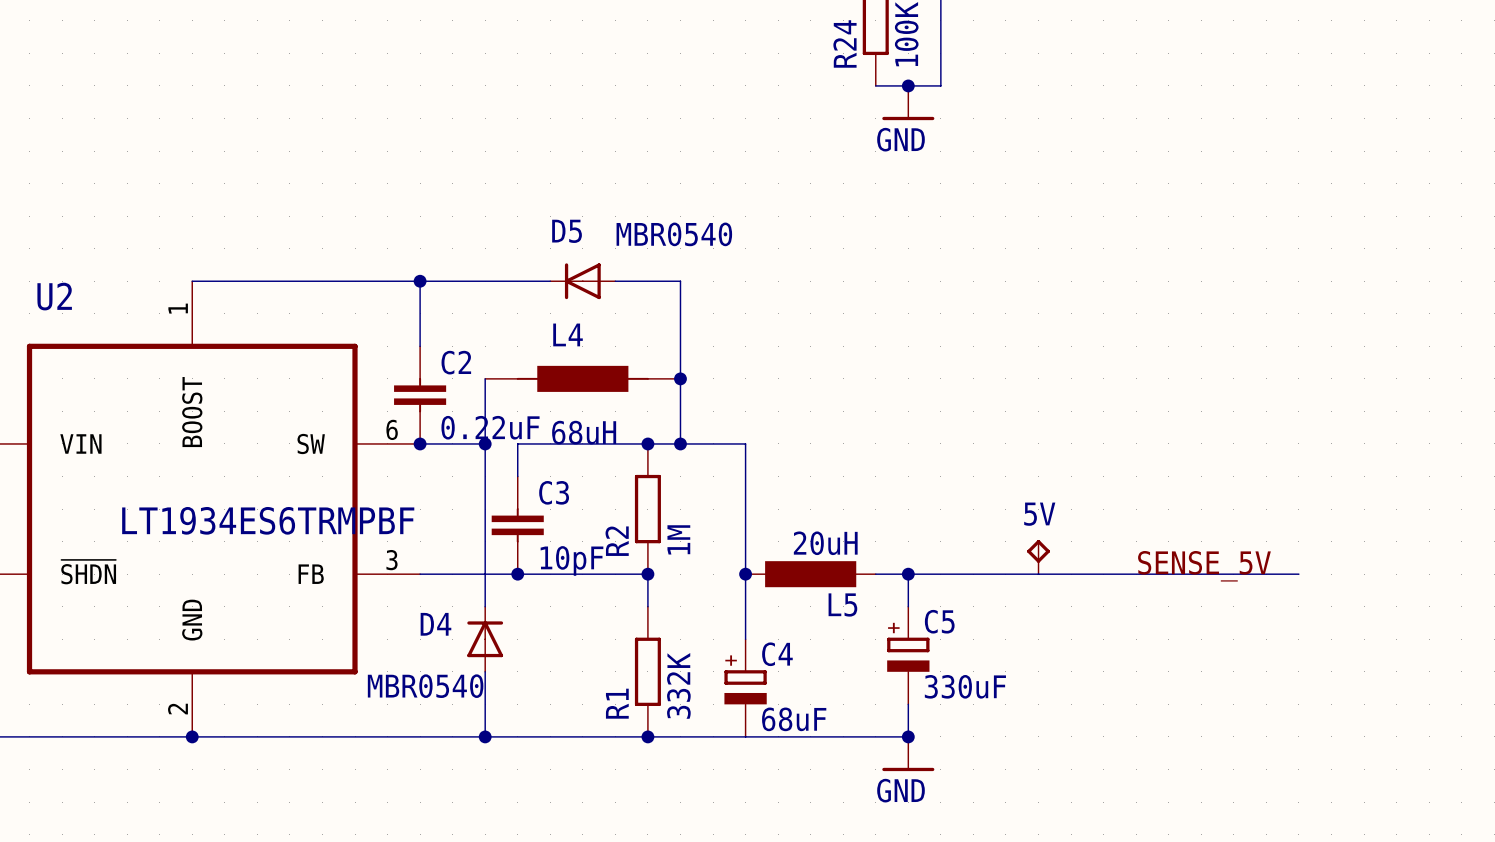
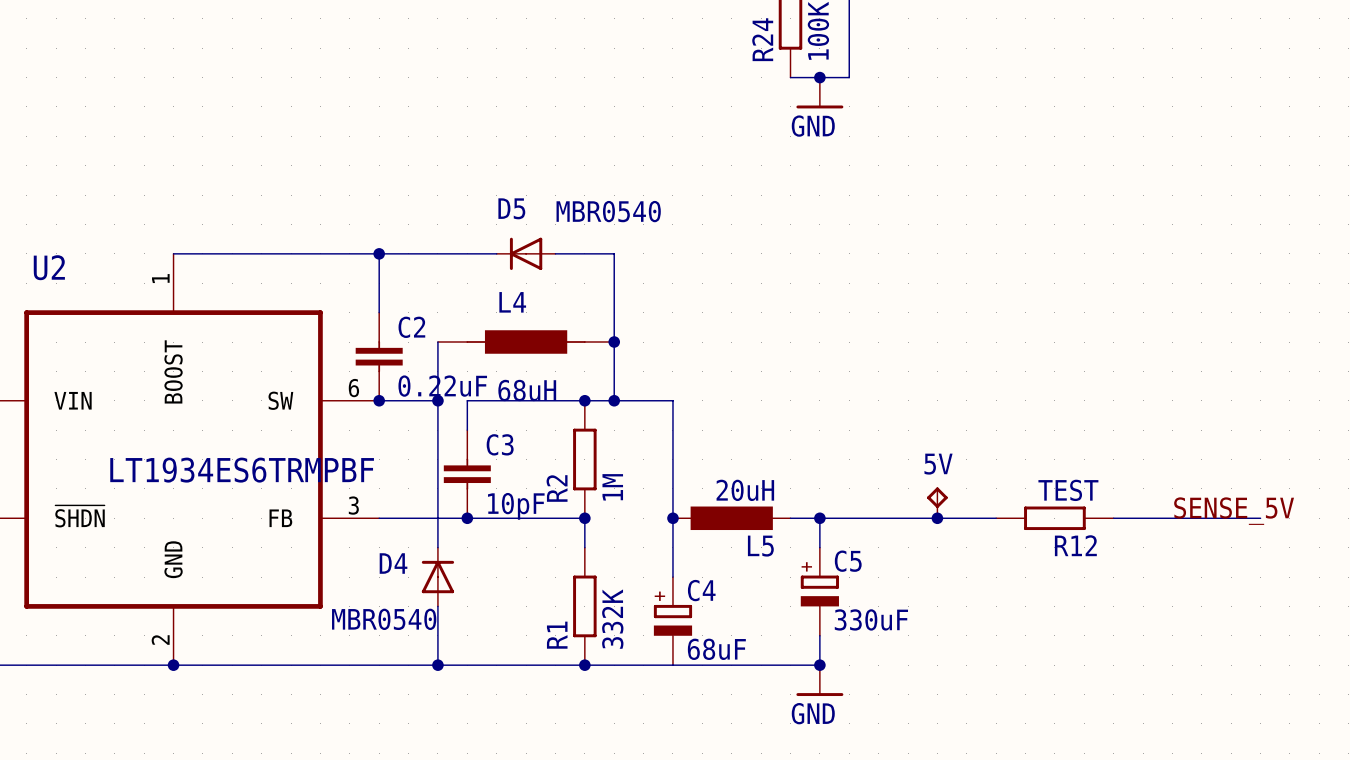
label position: SENSE_5V (1204, 566) -> SENSE_5V (1234, 511)
junction: none -> (937, 518)
R12: none -> TEST (1054, 518)
wire: none -> (1172, 518) (1260, 518)

